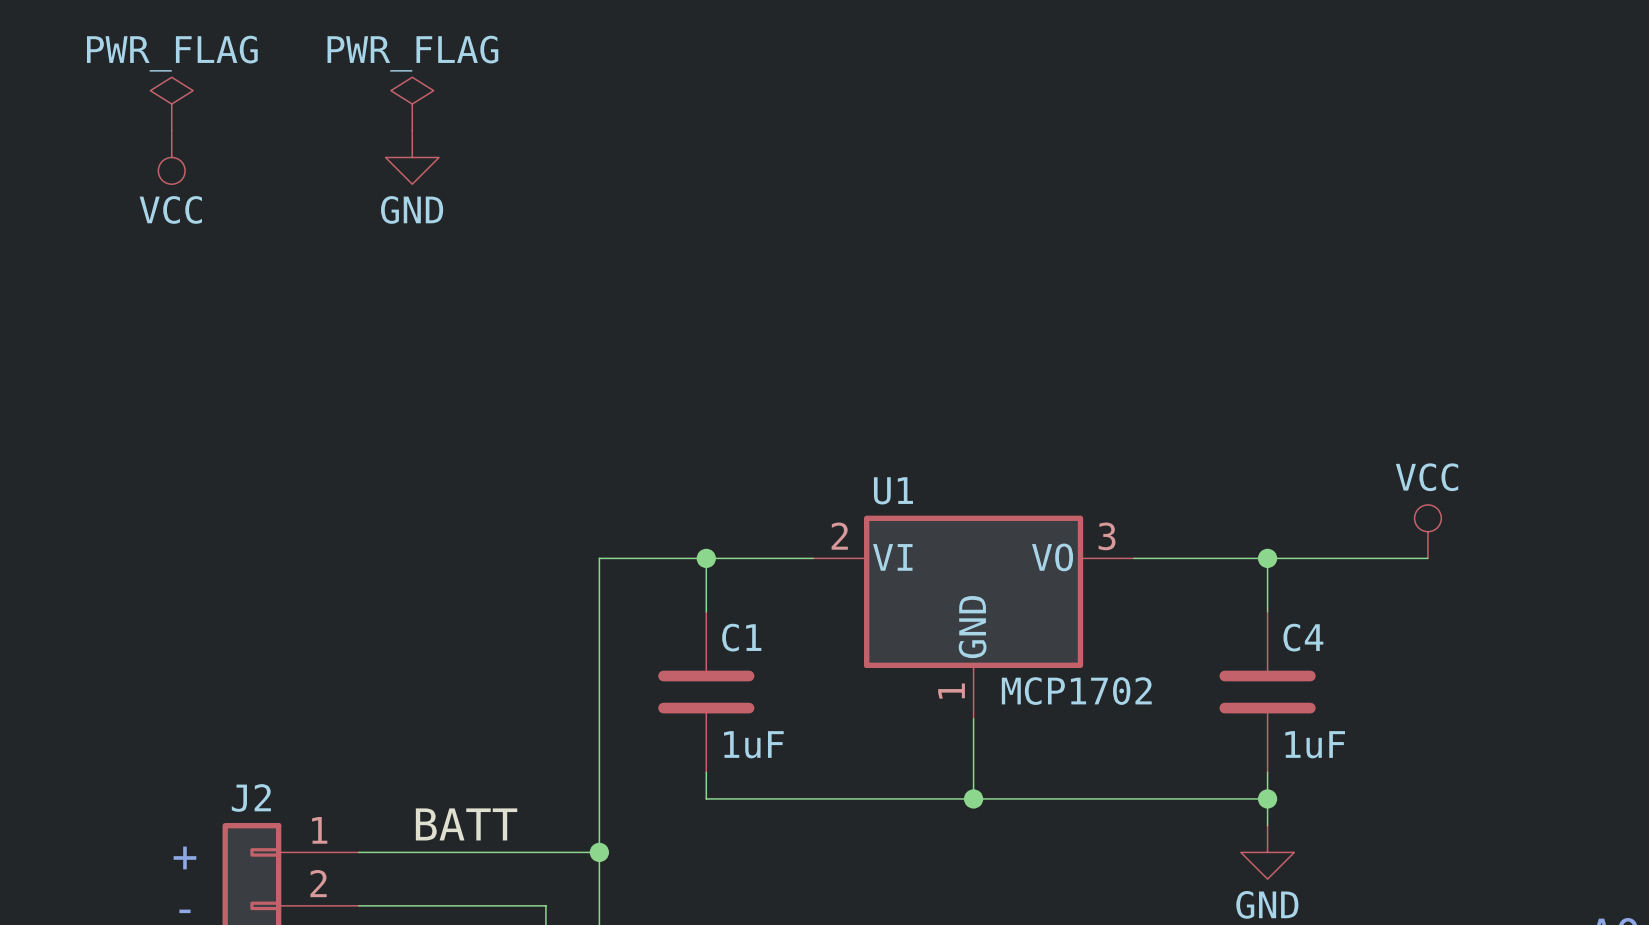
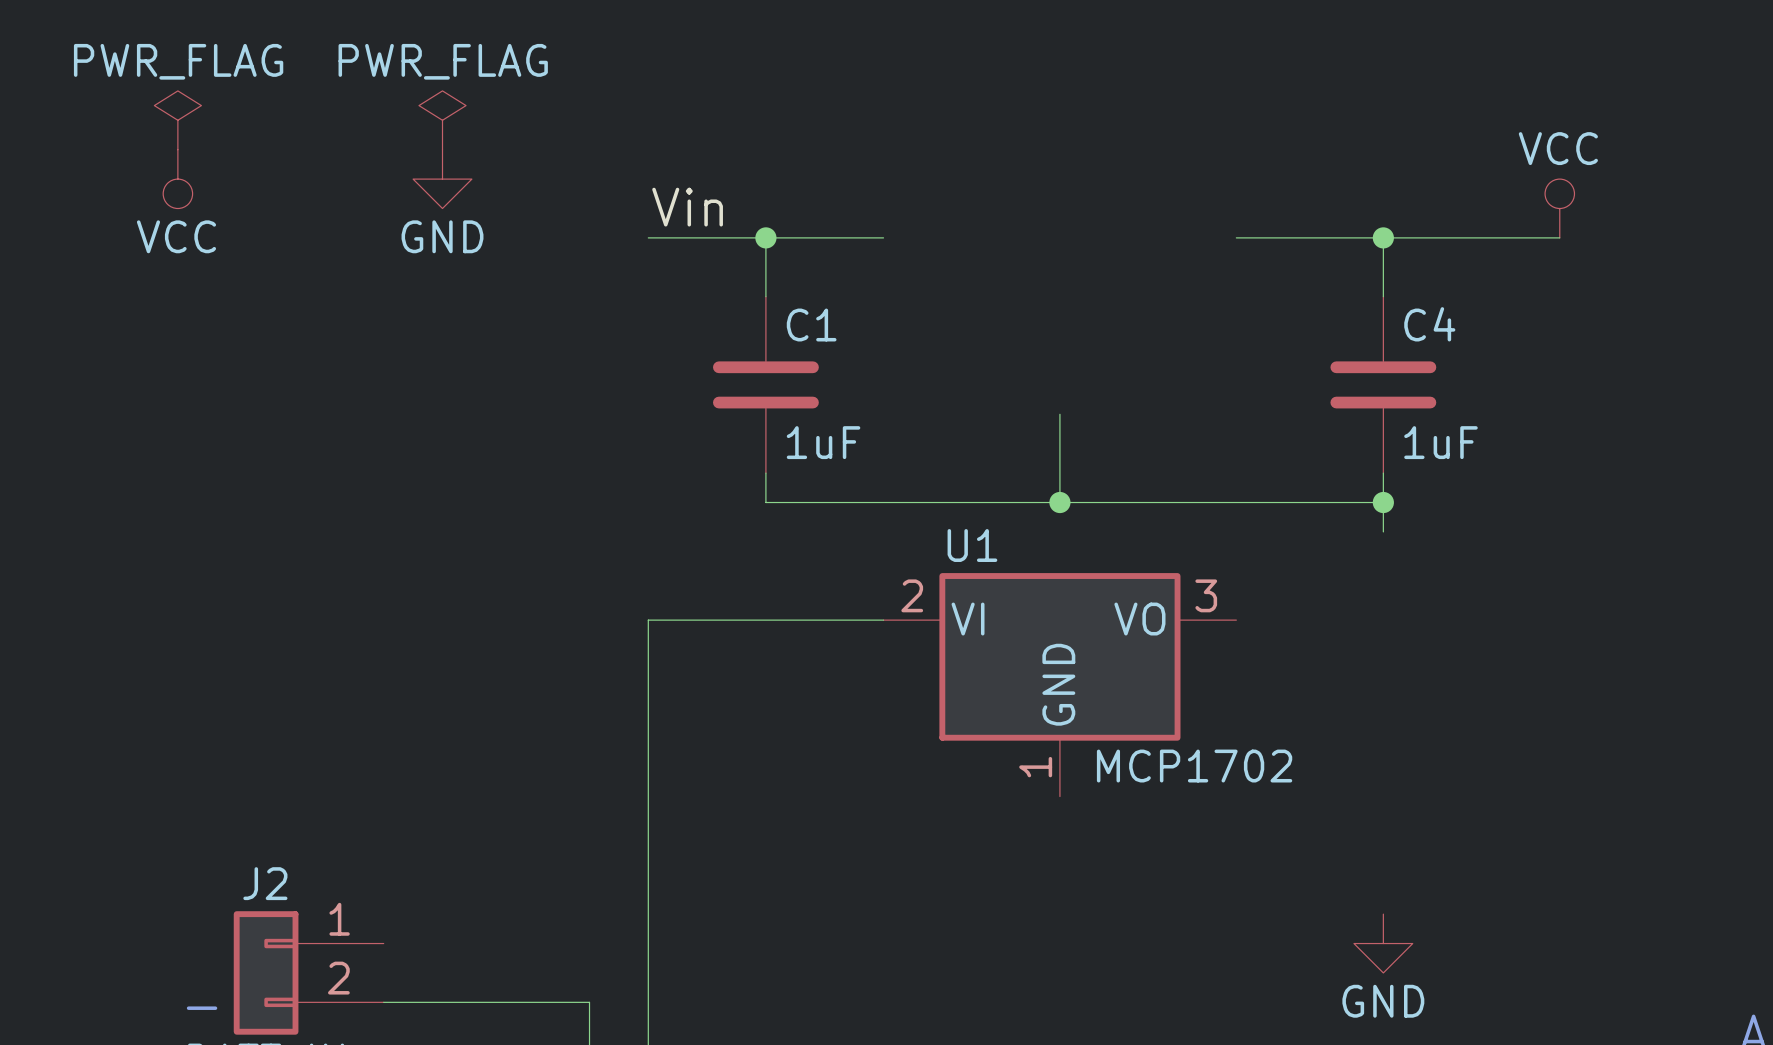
label: none -> Vin (687, 207)
wire: none -> (648, 237) (883, 237)
junction: none -> (765, 237)
junction: none -> (1383, 237)
junction: none -> (1059, 502)
power symbol position: VCC (1427, 531) -> VCC (1559, 208)
wire: (706, 558) (706, 611) -> (765, 237) (765, 296)
junction: (706, 558) -> none
wire: (1133, 558) (1427, 558) -> (1236, 237) (1559, 237)
wire: (1267, 558) (1267, 611) -> (1383, 237) (1383, 296)
junction position: (1267, 558) -> (1383, 502)
C1 position: (706, 692) -> (765, 384)
C4 position: (1267, 692) -> (1383, 384)
wire: (973, 718) (973, 798) -> (1059, 414) (1059, 502)
wire: (706, 772) (706, 798) (1267, 798) -> (765, 473) (765, 502) (1383, 502)
wire: (1267, 772) (1267, 825) -> (1383, 473) (1383, 531)
junction: (973, 798) -> none
junction: (1267, 798) -> none
label: BATT (466, 824) -> none
wire: (358, 852) (599, 852) -> none
junction: (599, 852) -> none
text: + (184, 857) -> none

